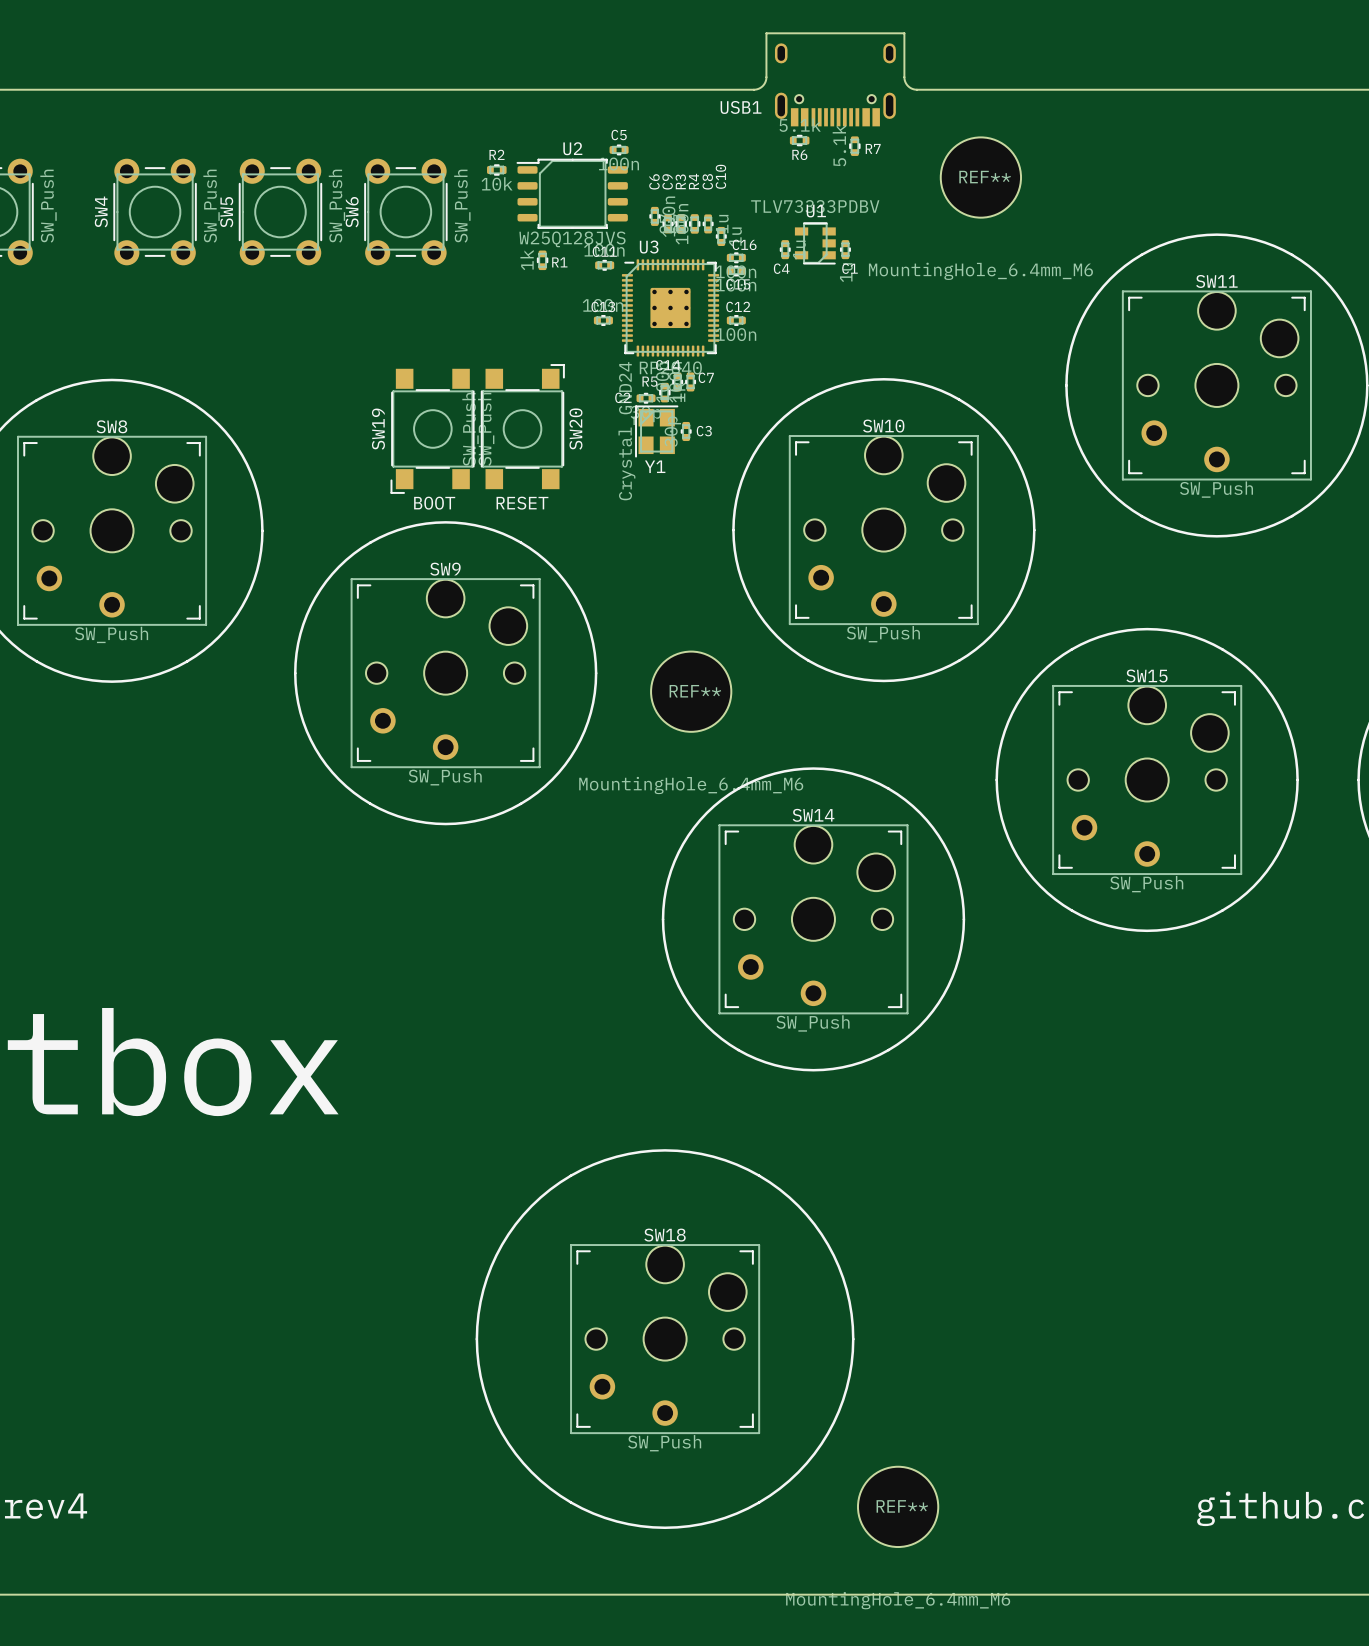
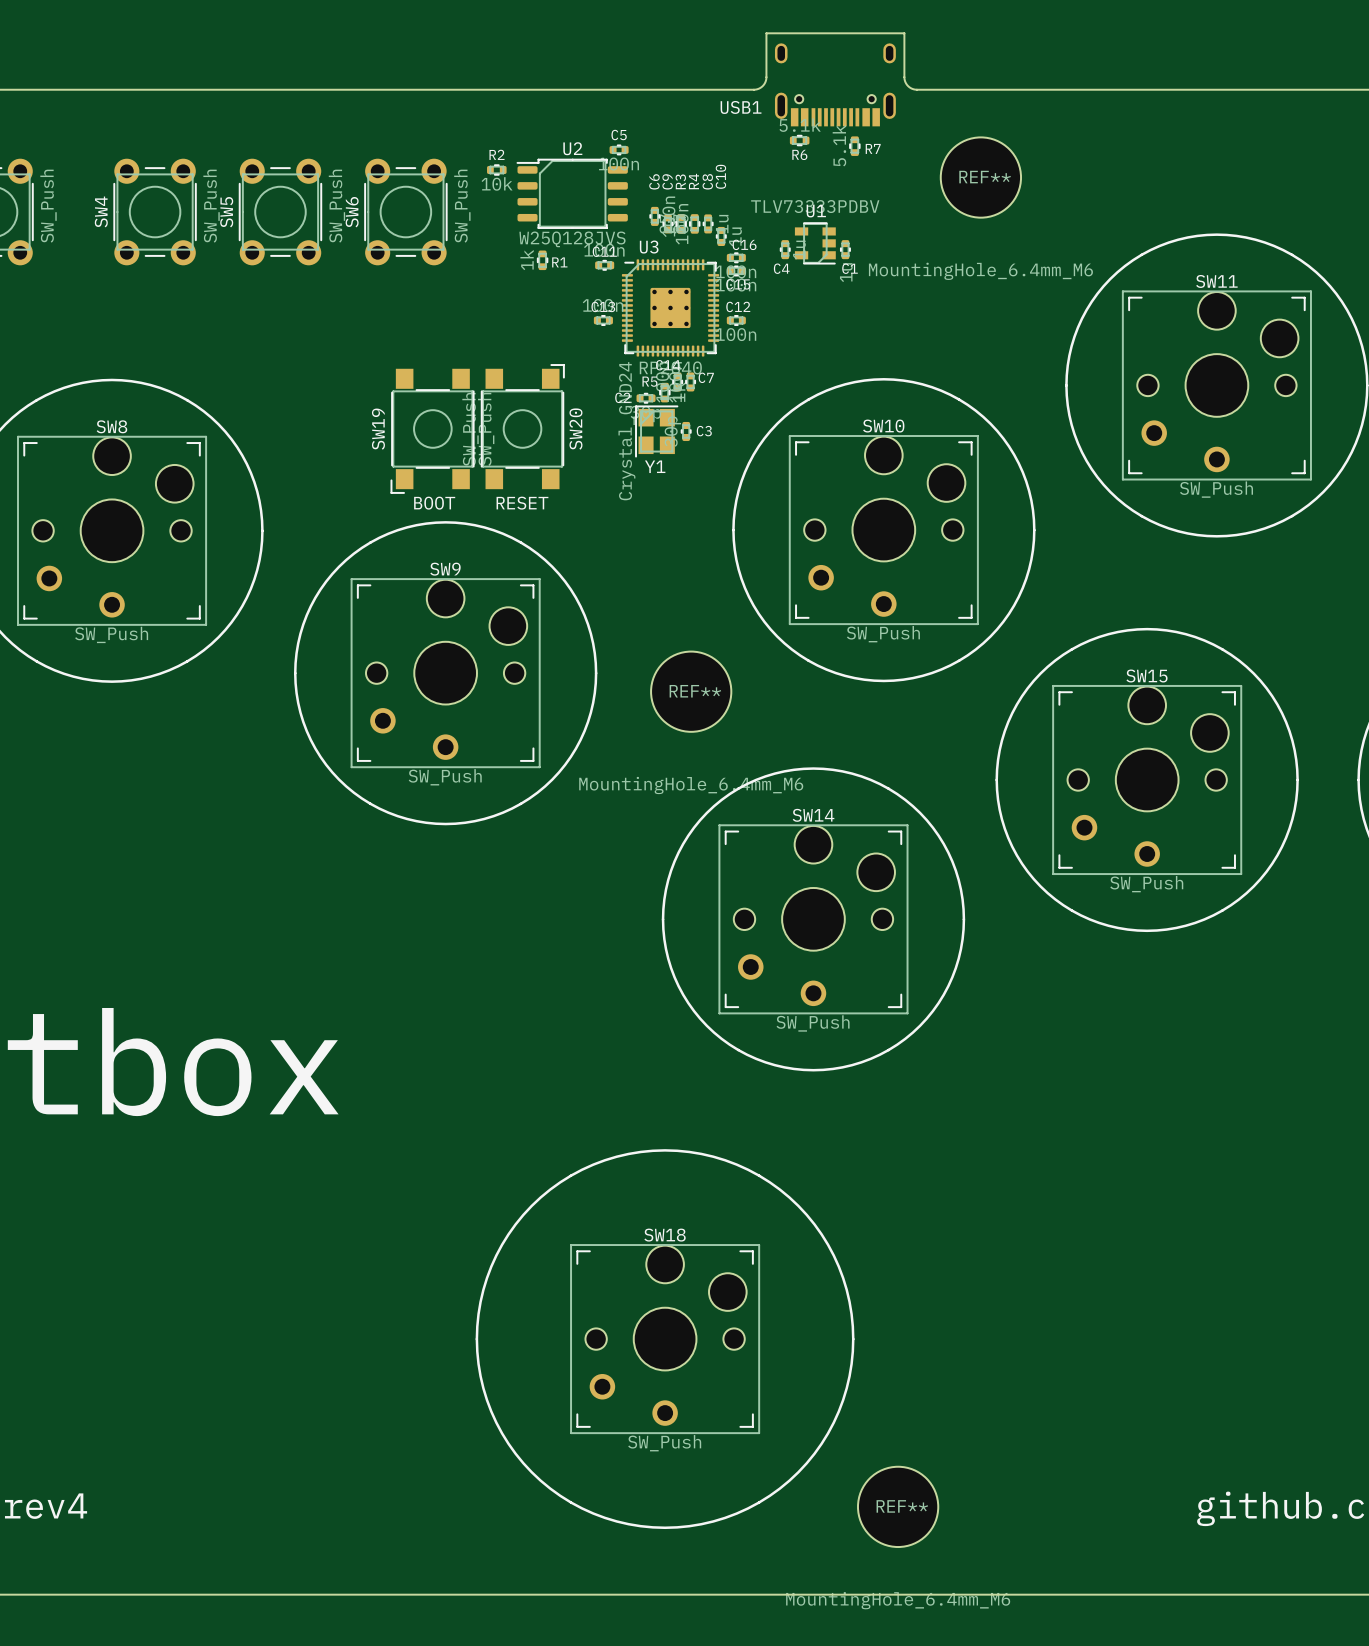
SW11 footprint: [1121, 290, 1312, 481] -> [1121, 290, 1312, 481]
SW8 footprint: [17, 435, 208, 626] -> [17, 435, 208, 626]
SW10 footprint: [788, 435, 979, 626] -> [788, 435, 979, 626]
SW9 footprint: [350, 578, 541, 769] -> [350, 578, 541, 769]
SW15 footprint: [1052, 685, 1243, 876] -> [1052, 685, 1243, 876]
SW14 footprint: [718, 824, 909, 1015] -> [718, 824, 909, 1015]
SW18 footprint: [570, 1244, 761, 1435] -> [570, 1244, 761, 1435]

